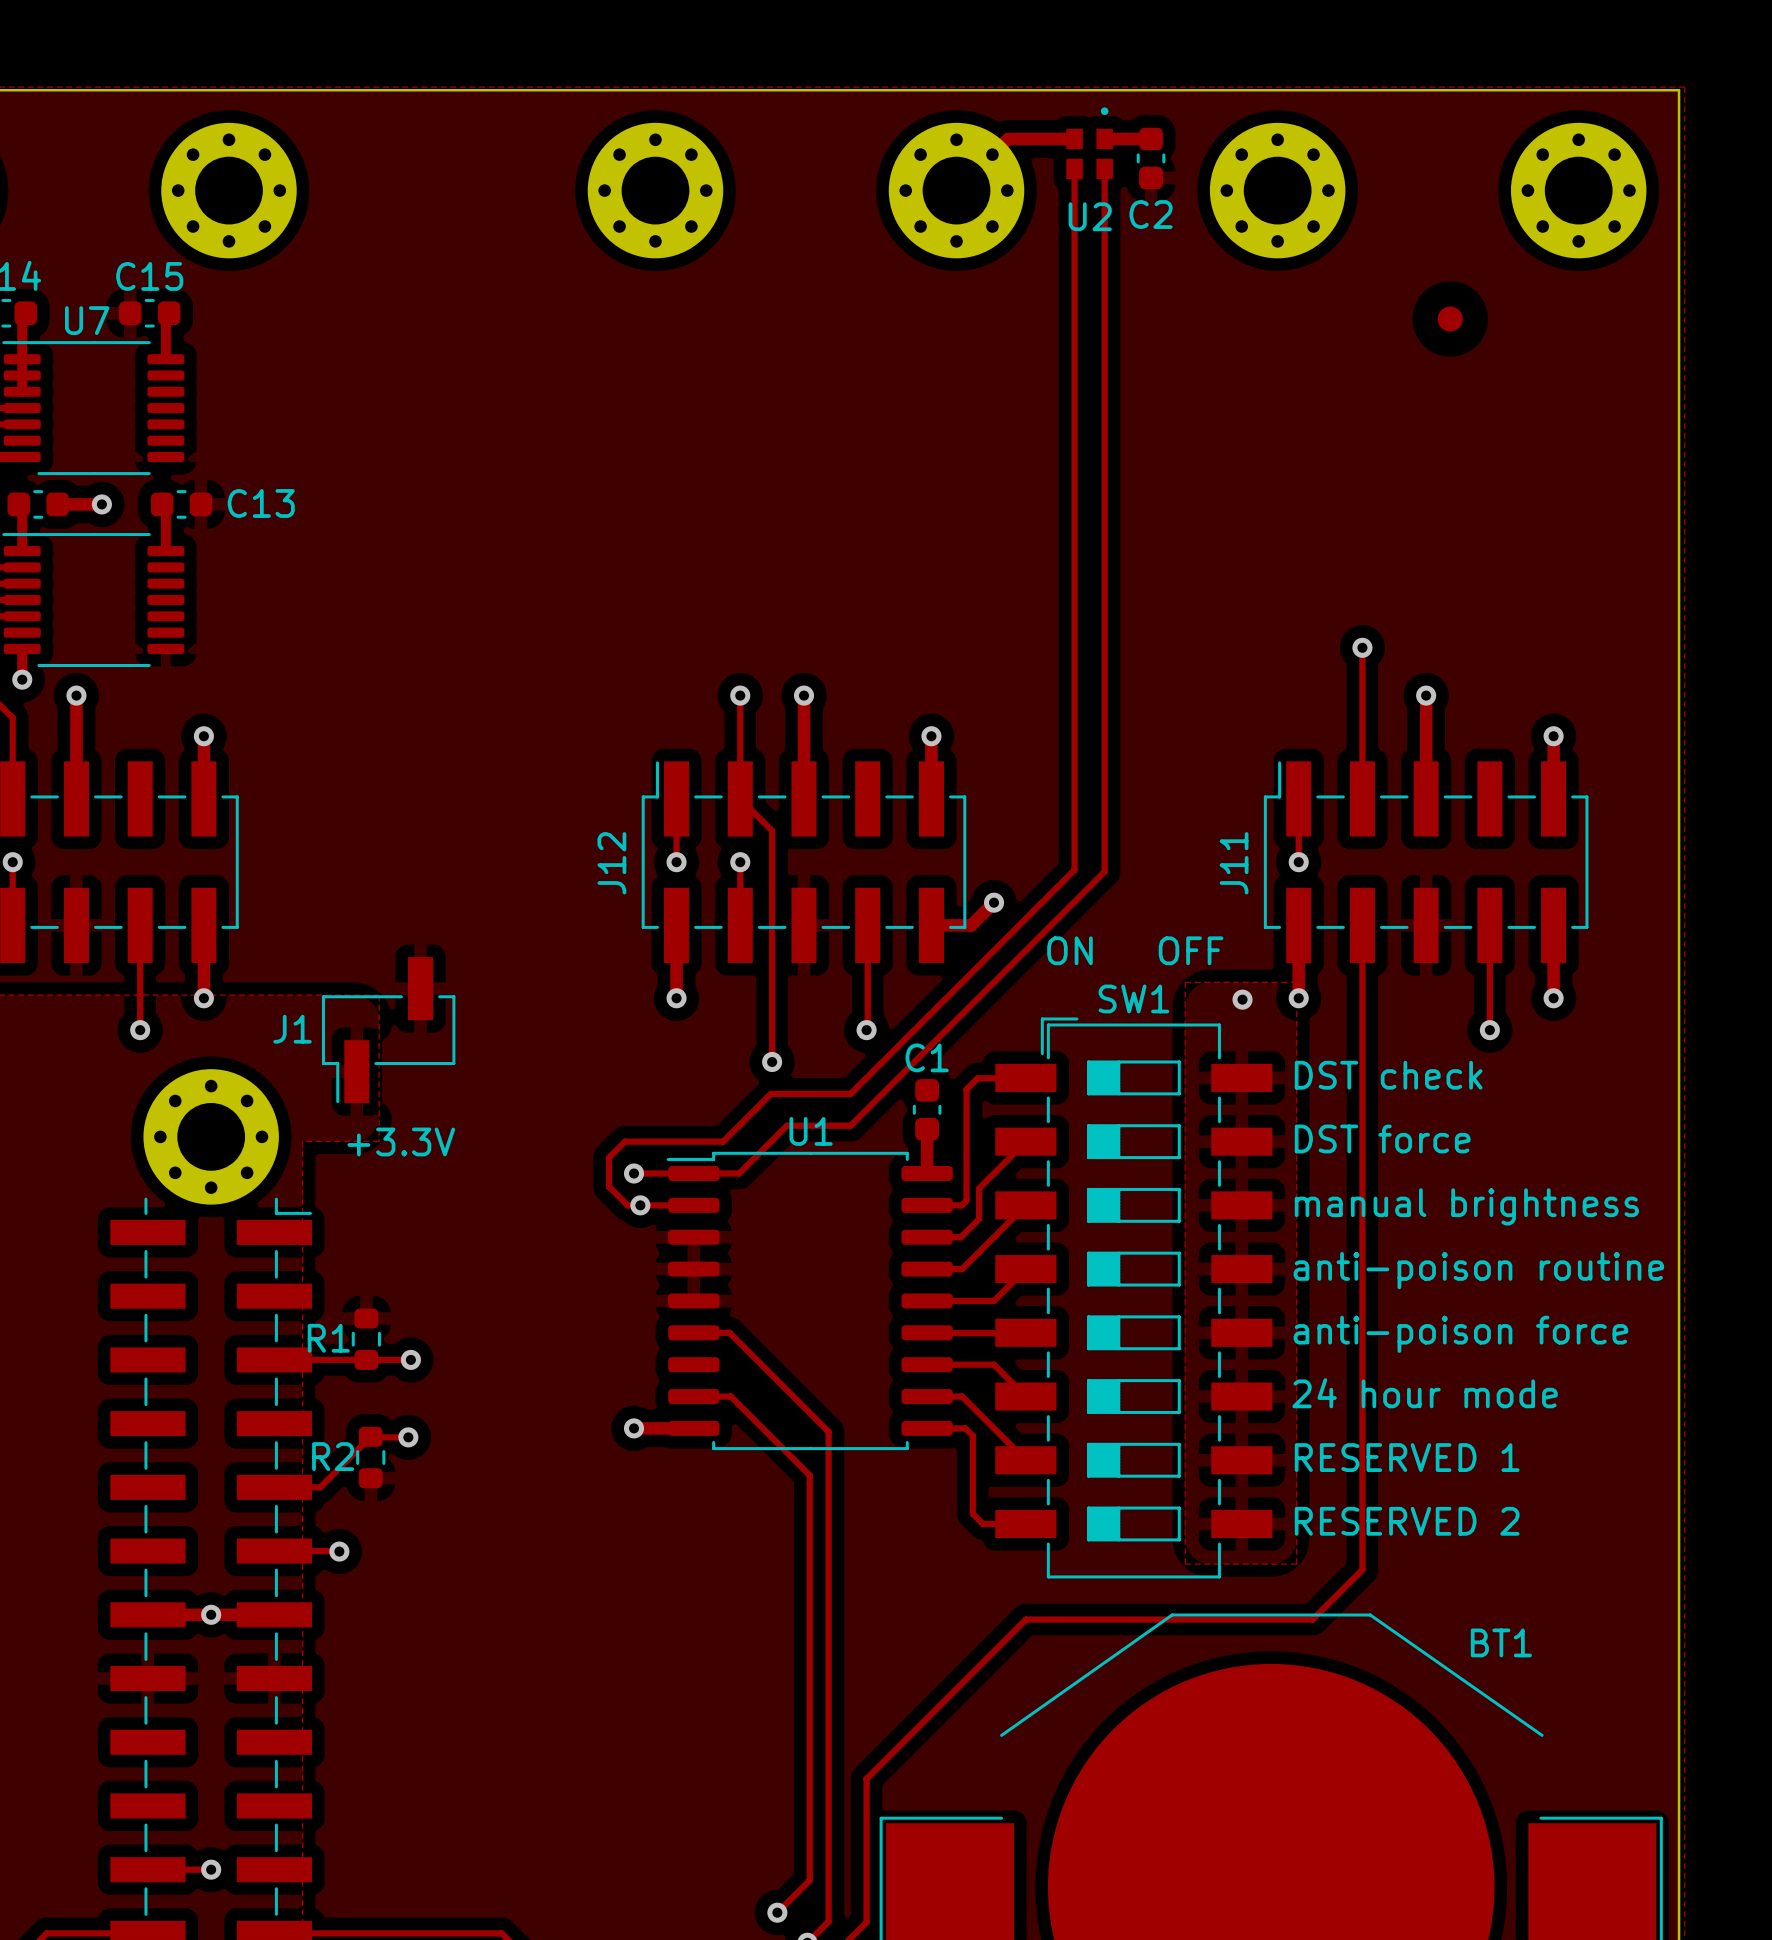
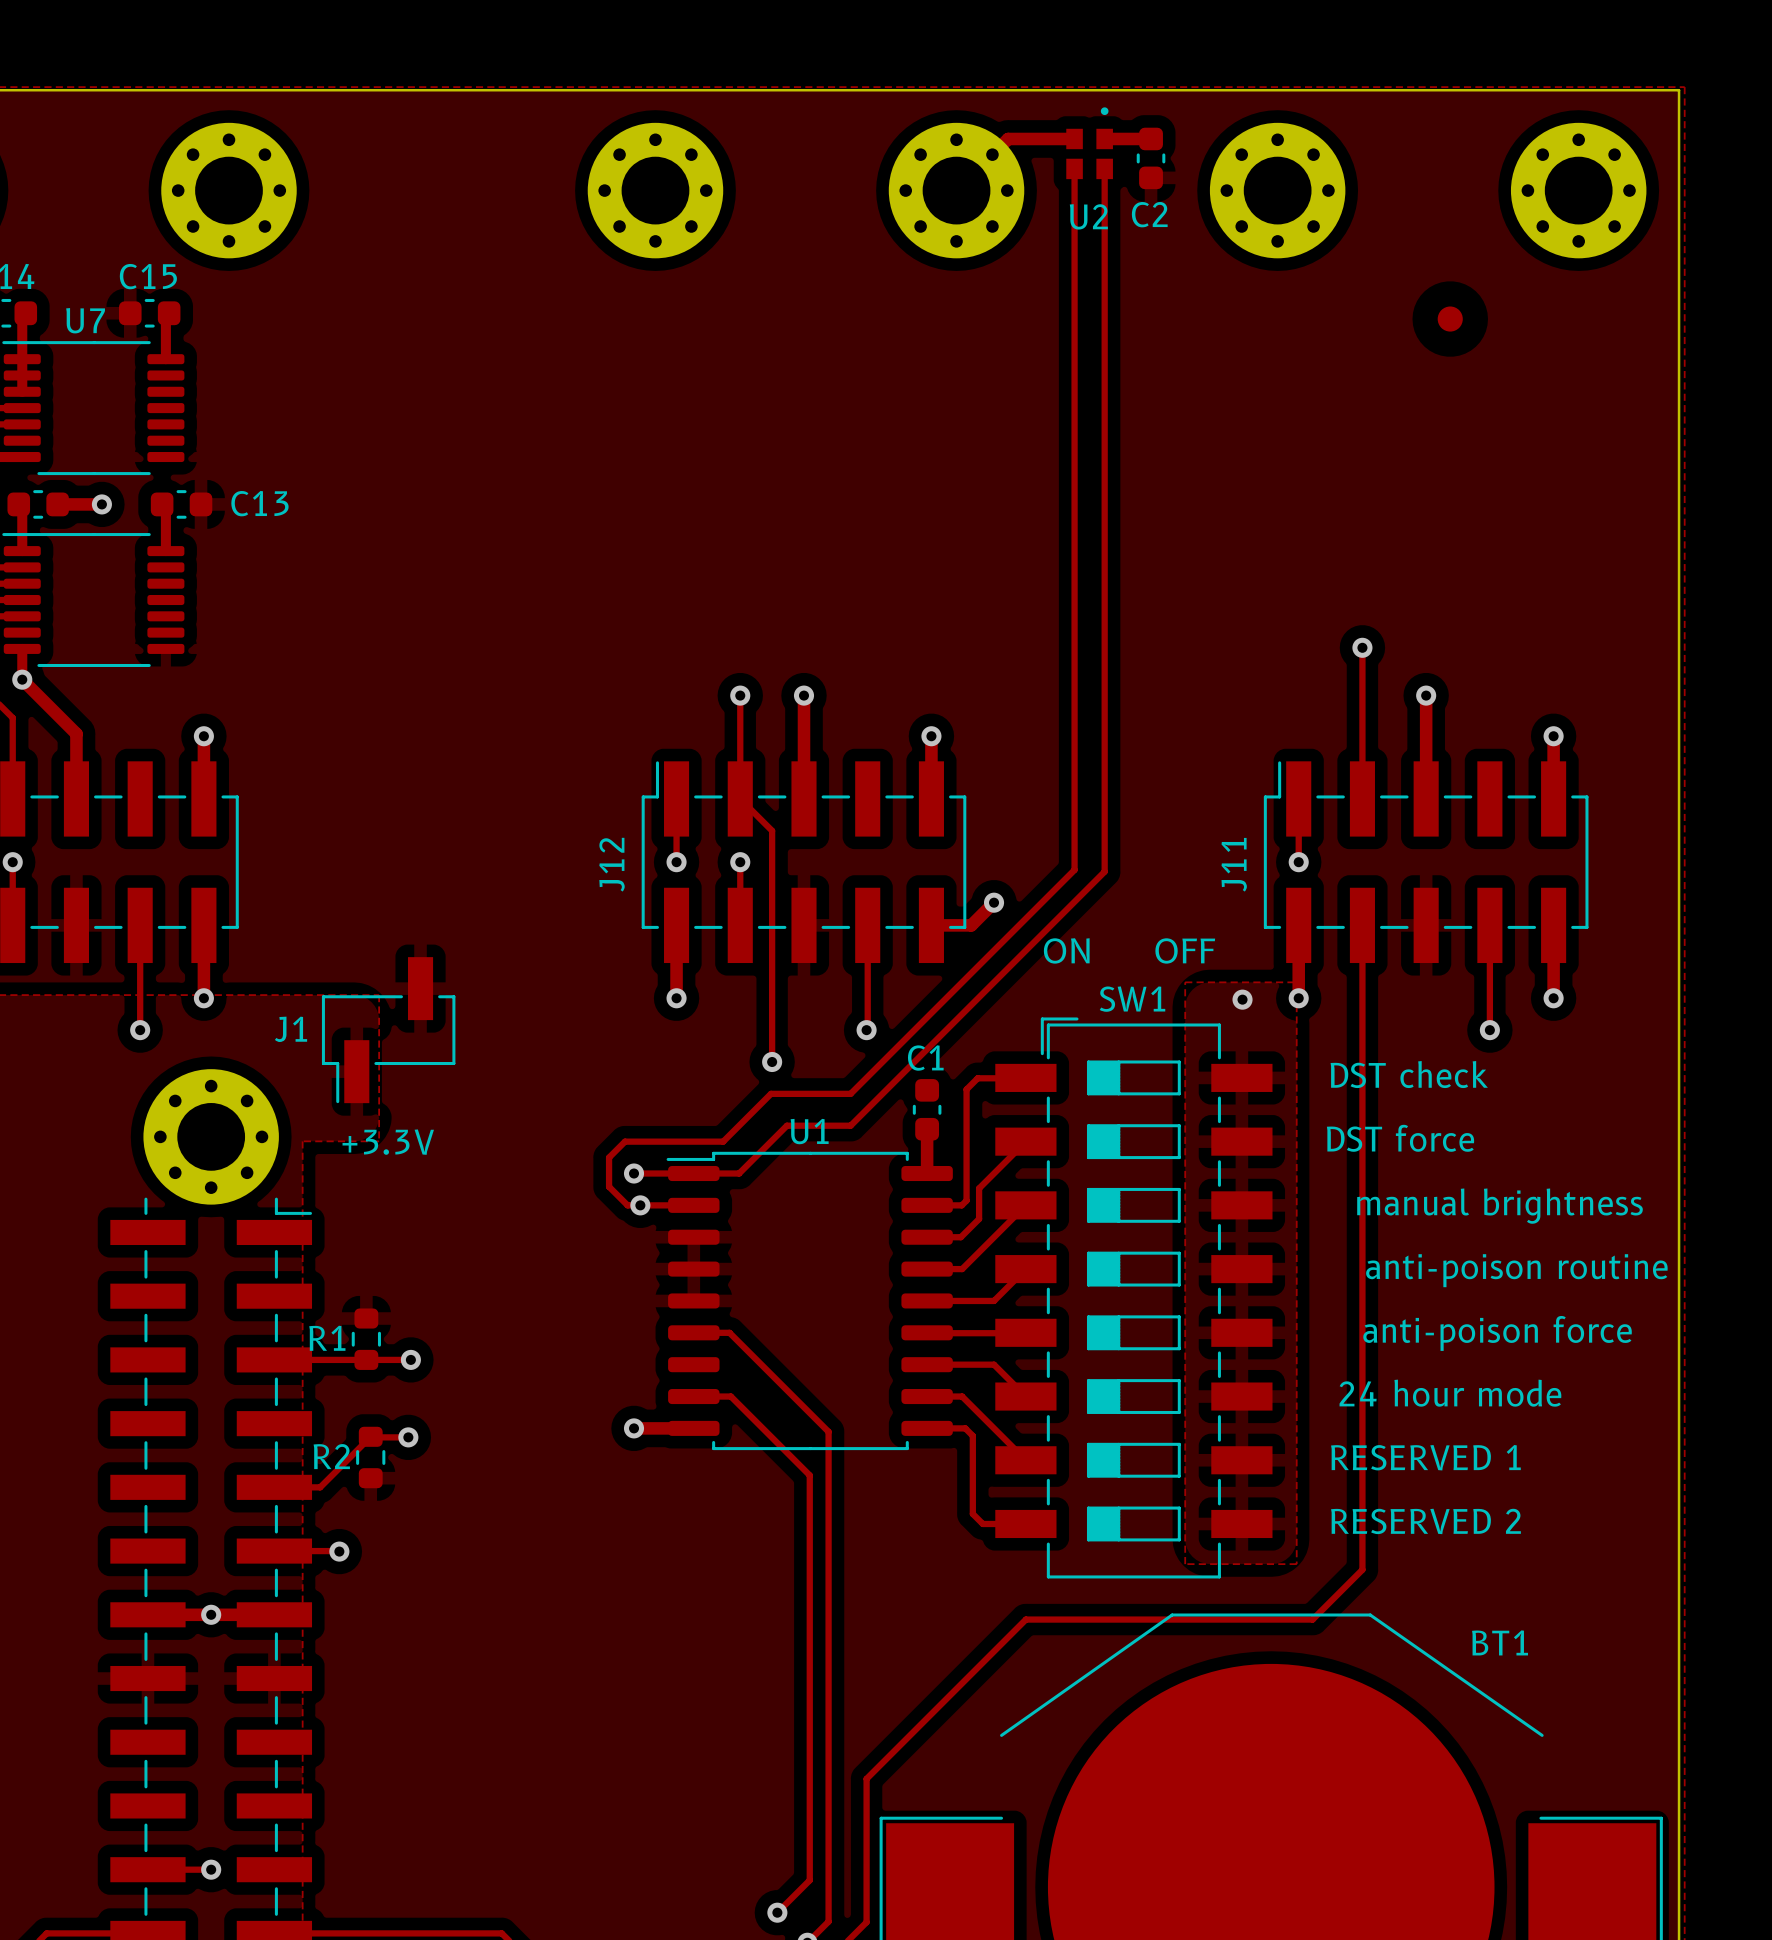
track: (76, 695) (76, 733) -> (22, 679) (76, 733)
via: (76, 695) -> none

